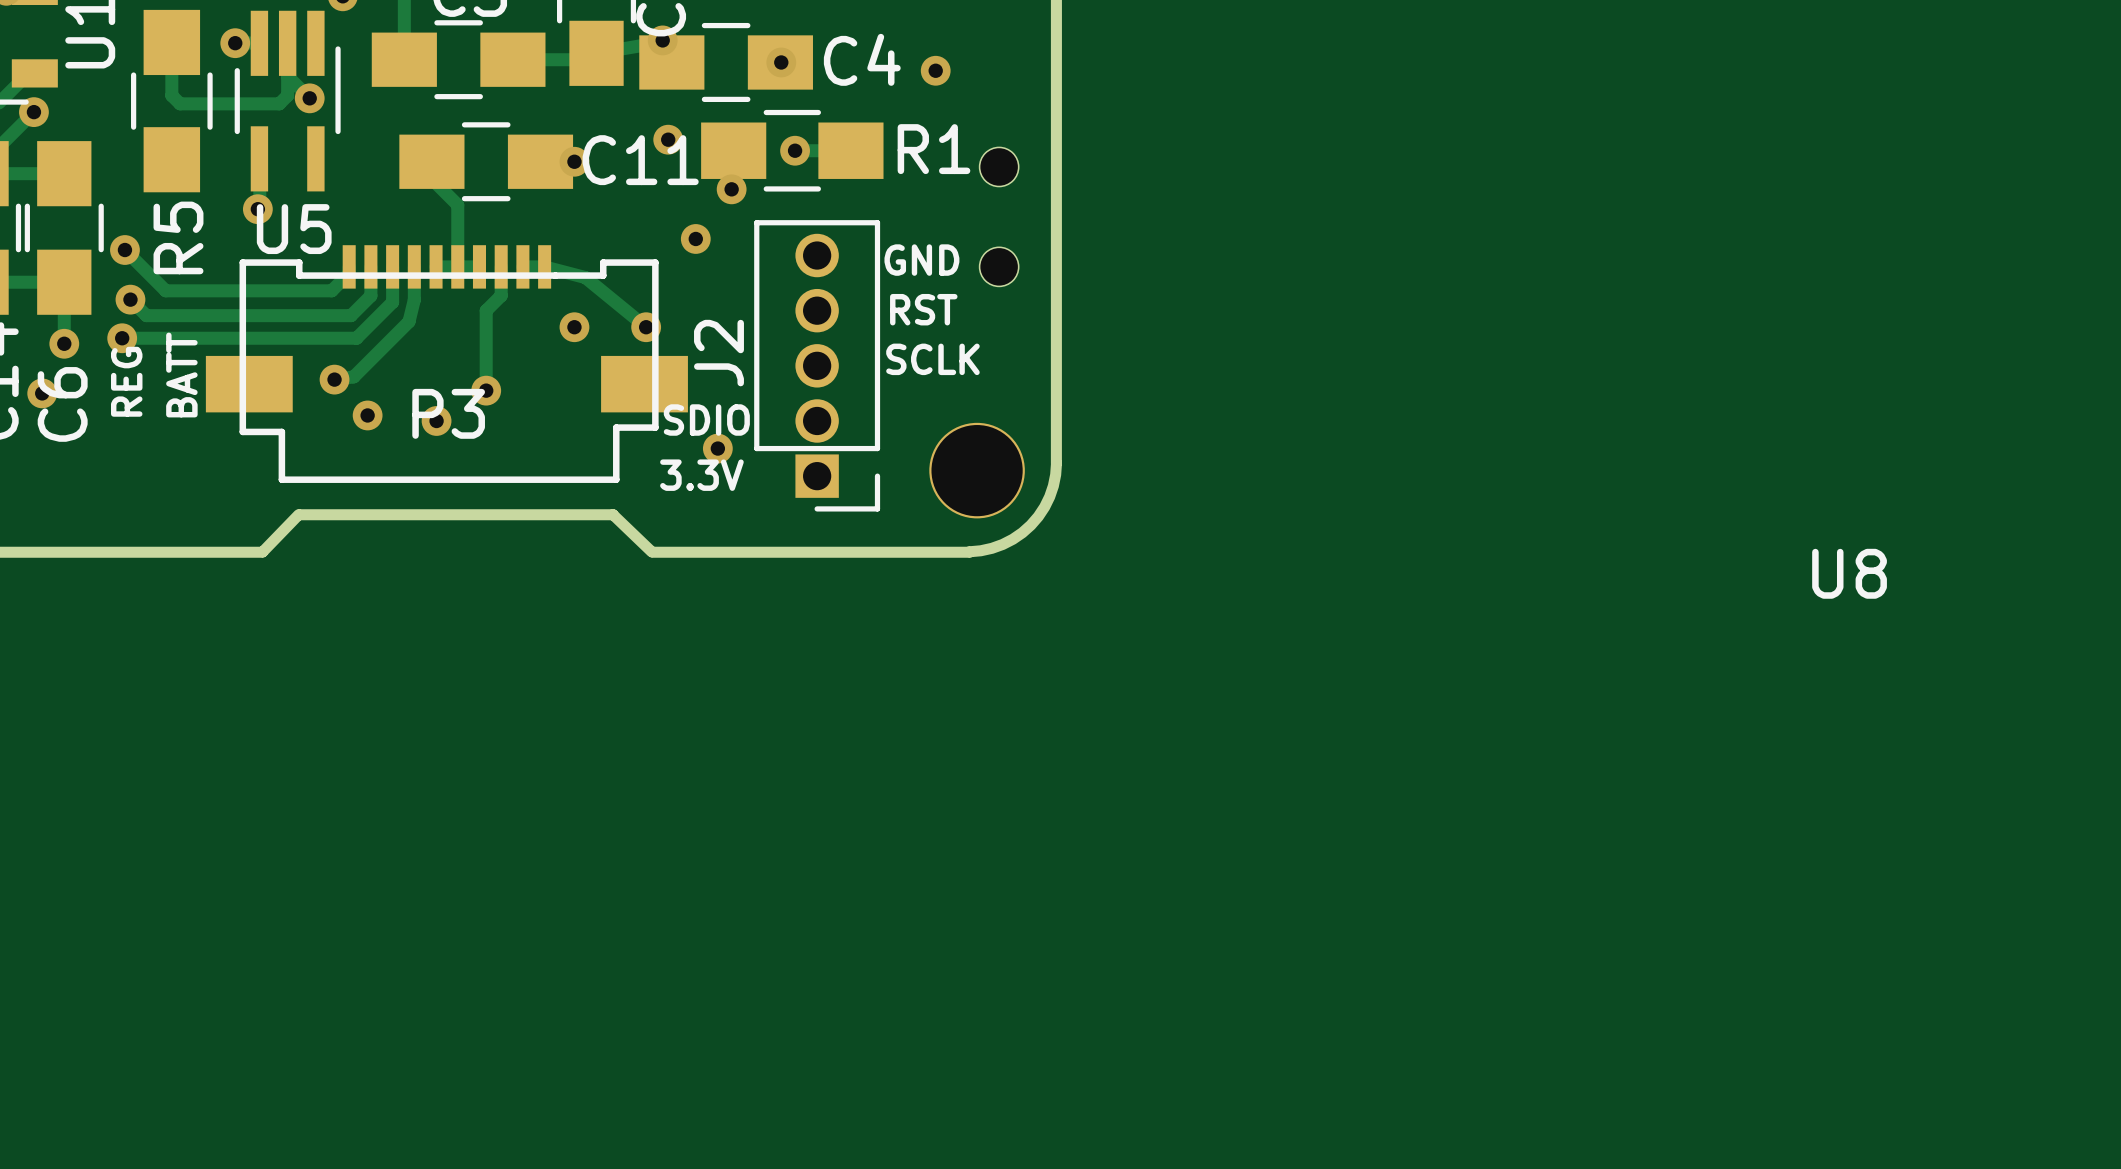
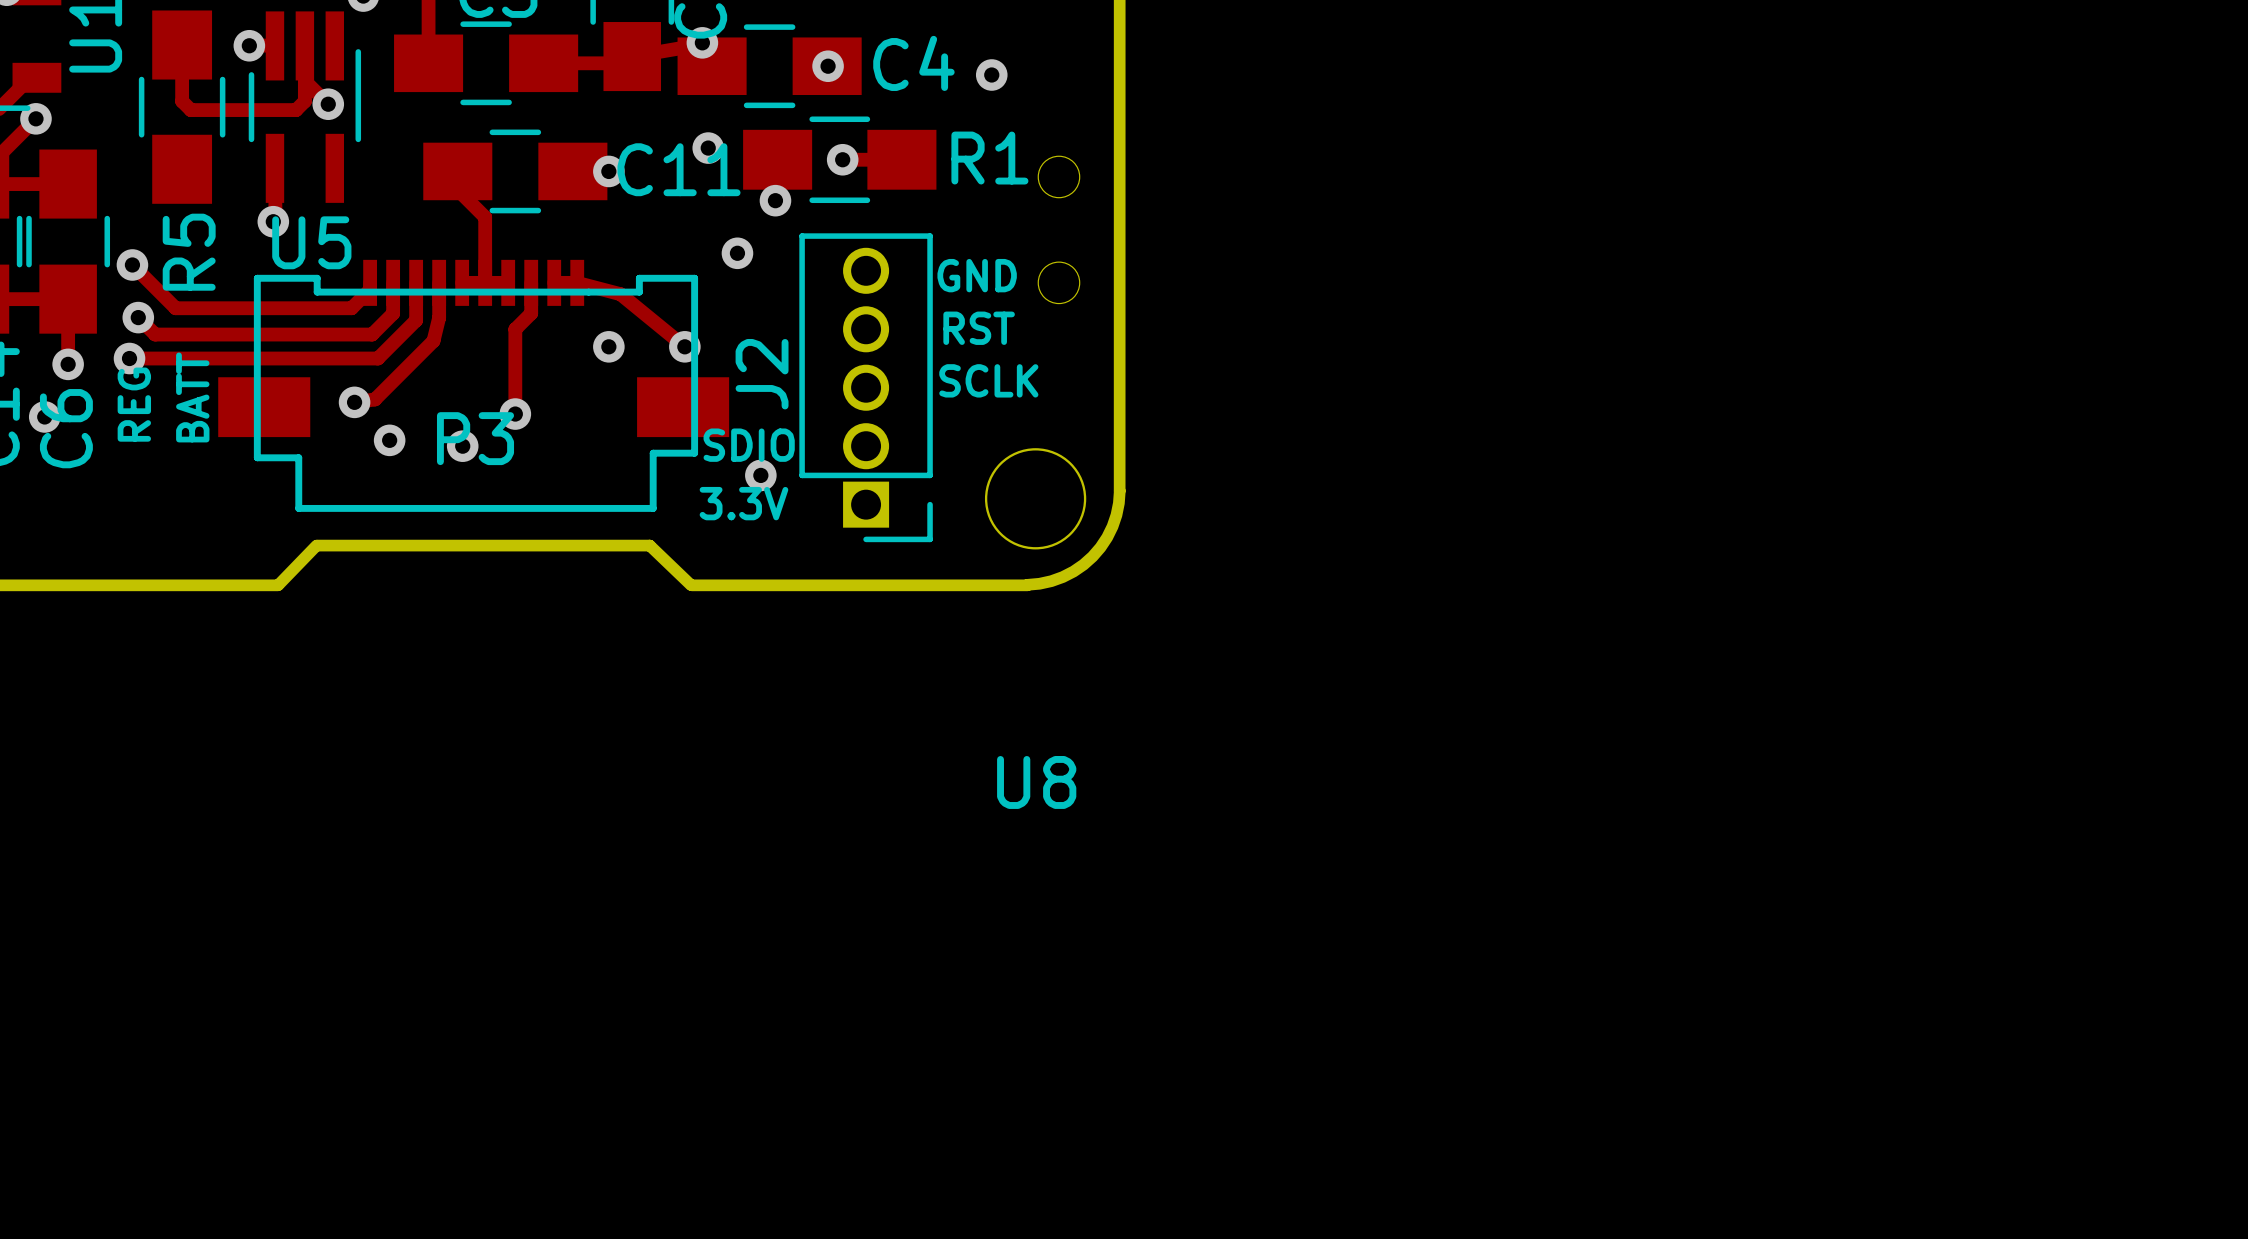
U8 name position: U8 (1849, 573) -> U8 (1036, 782)

